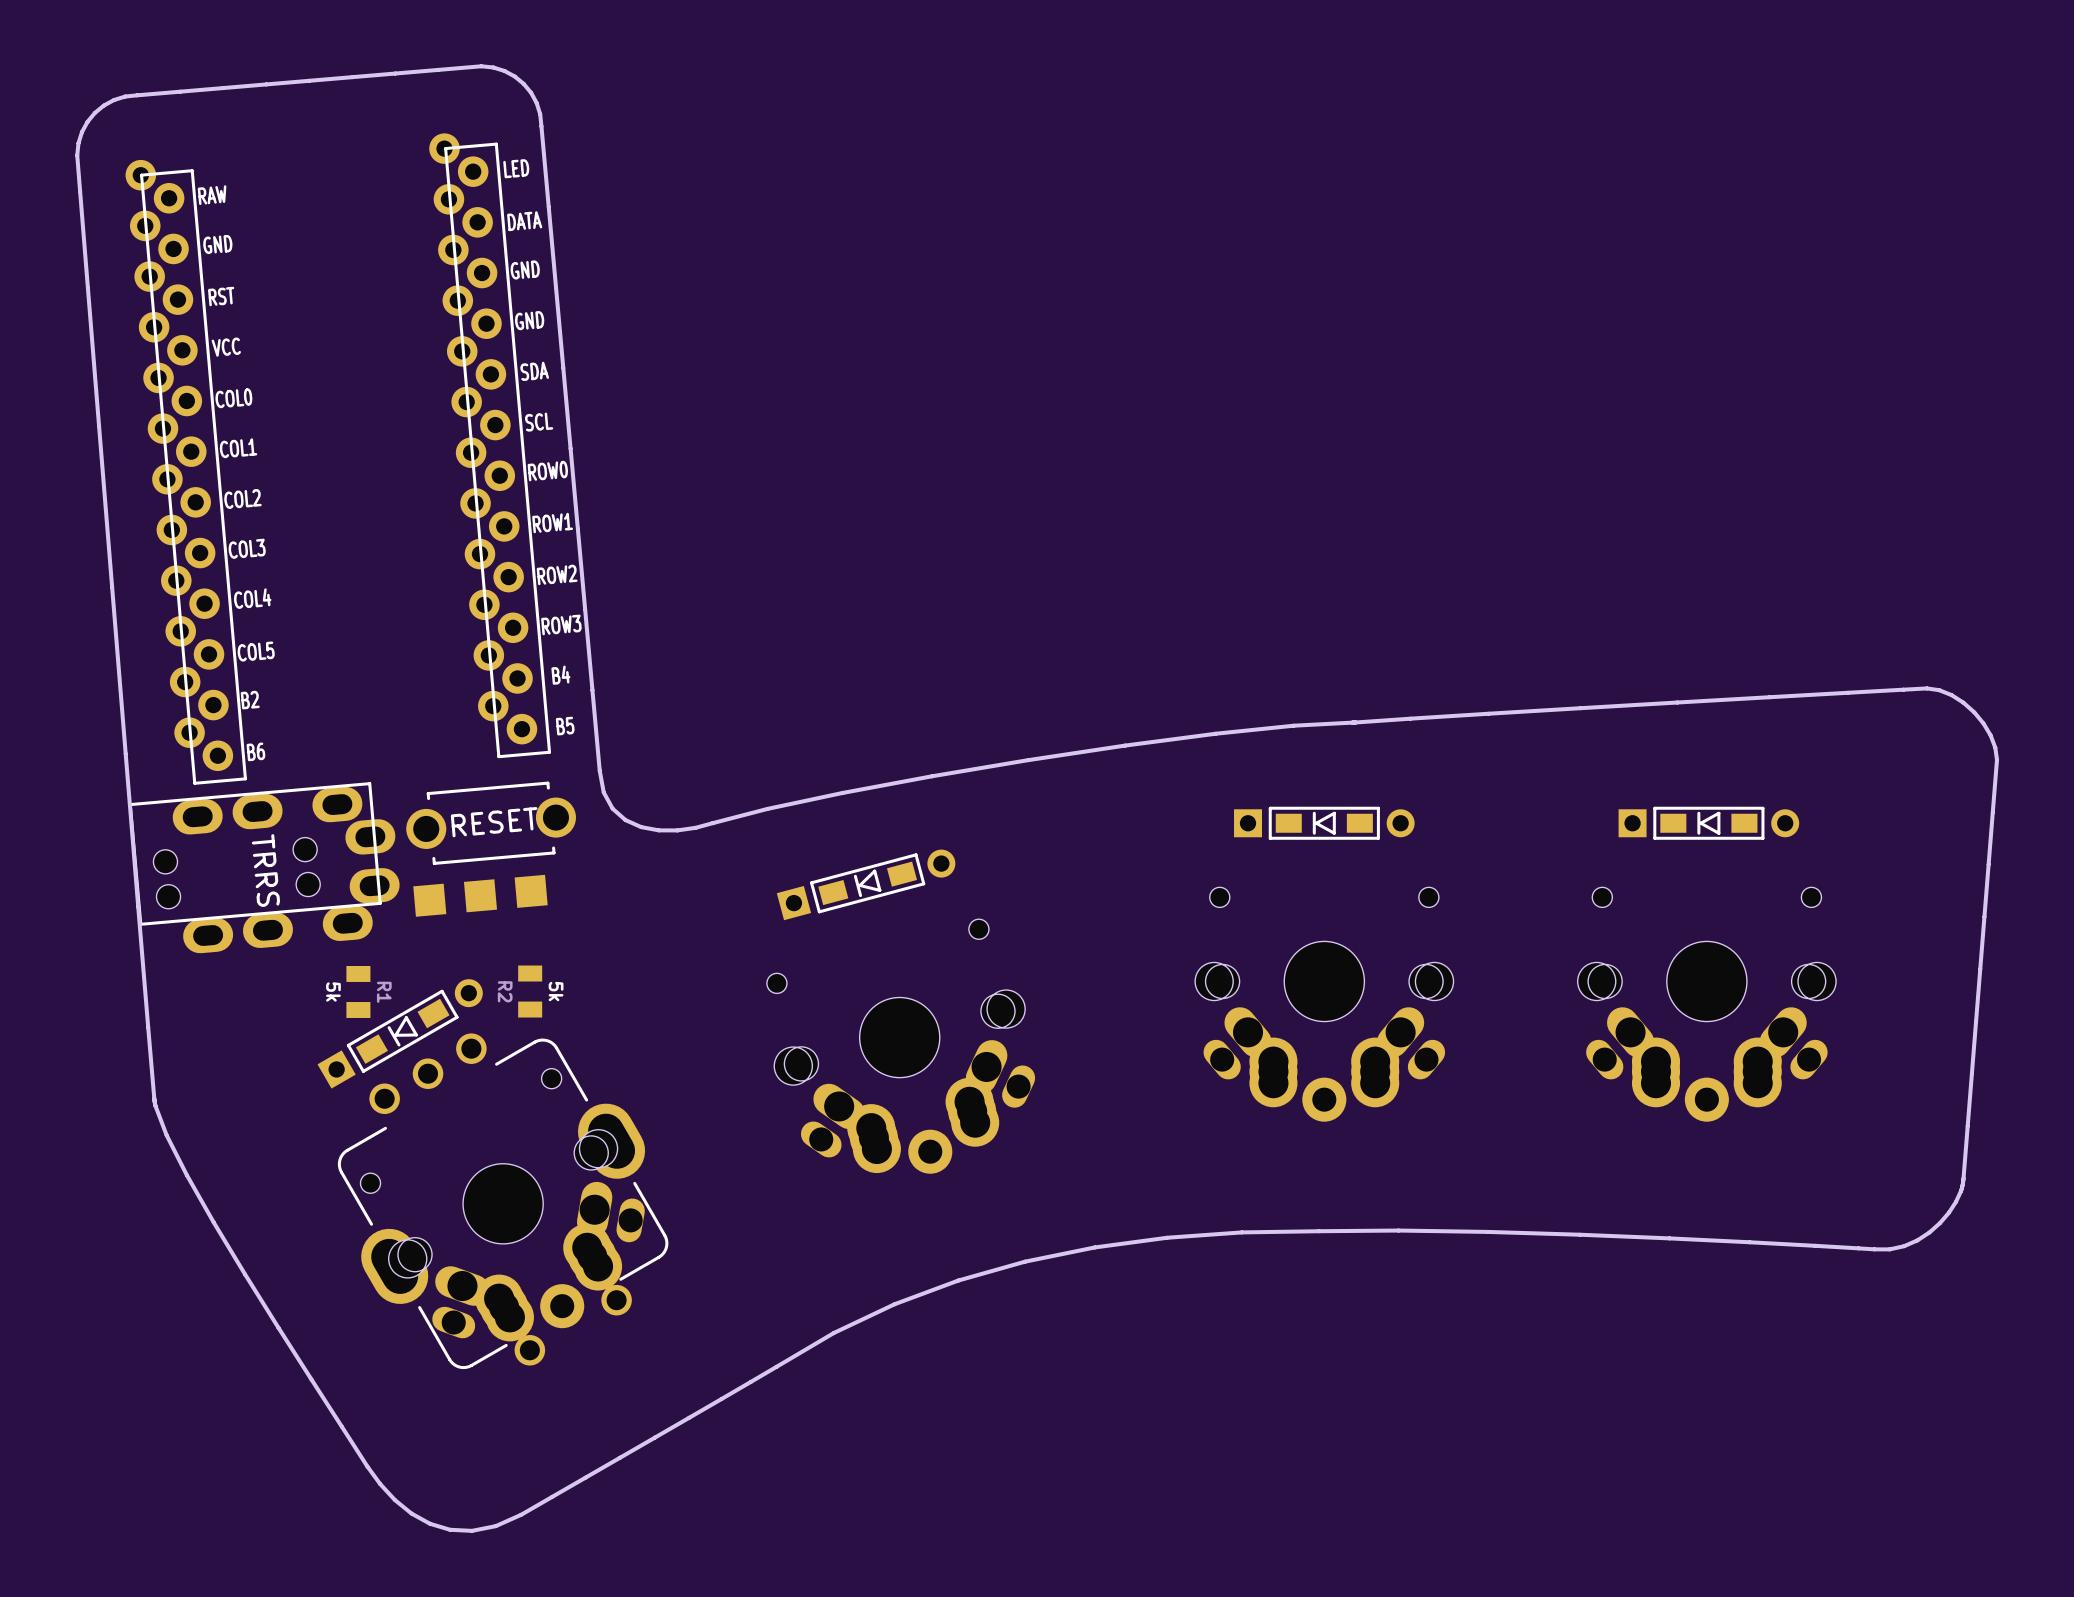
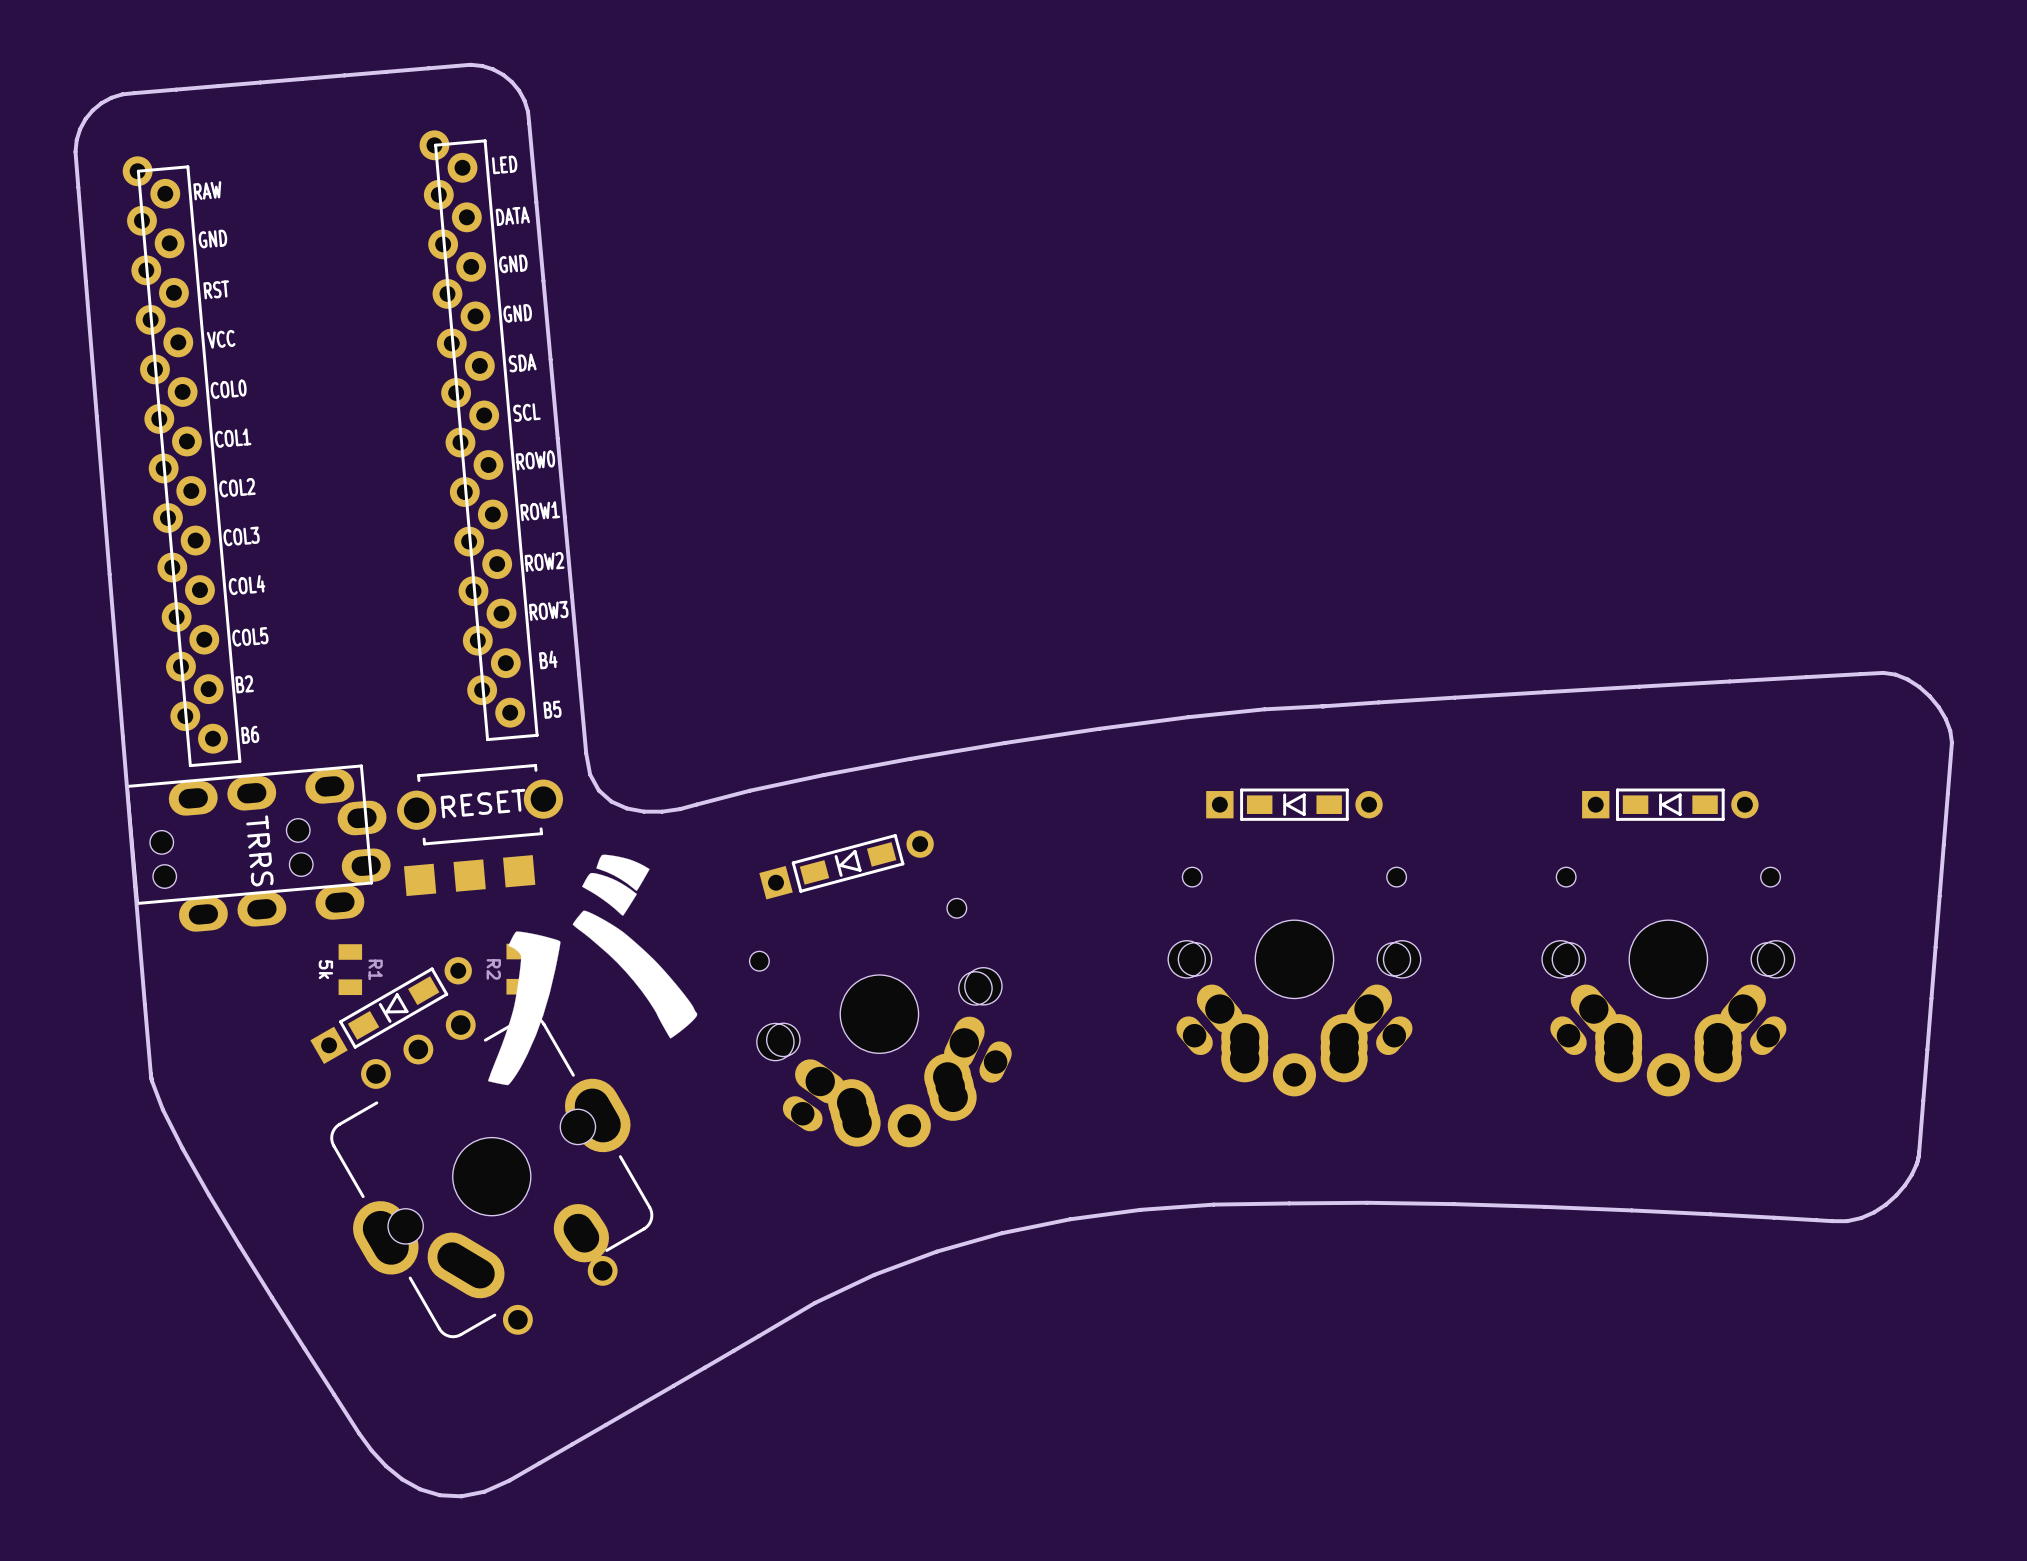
drawing: none -> [488, 854, 698, 1086]
part: (502, 1205) -> none
part: none -> (498, 1203)

